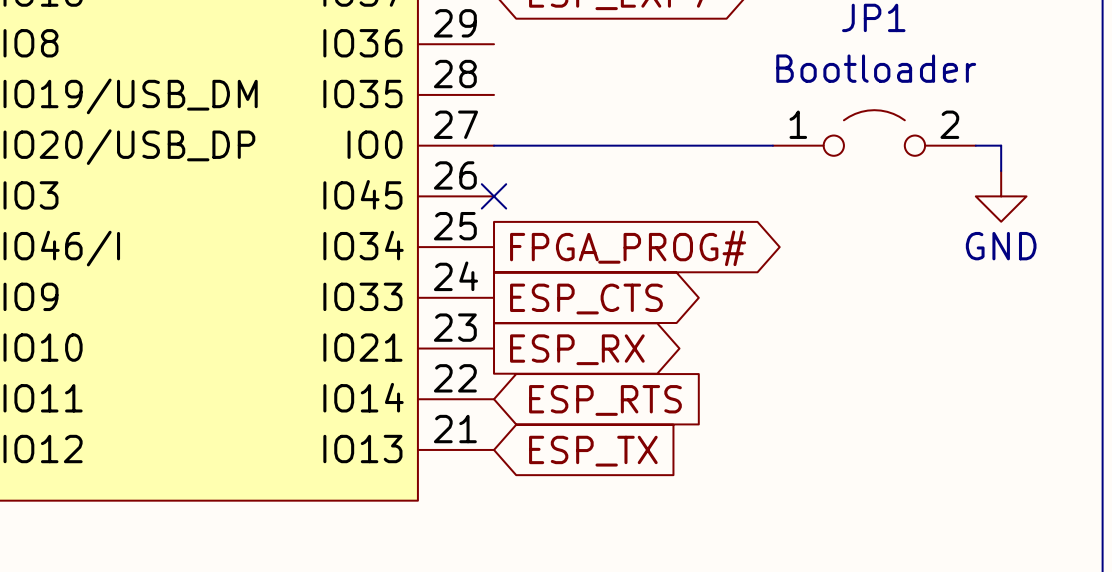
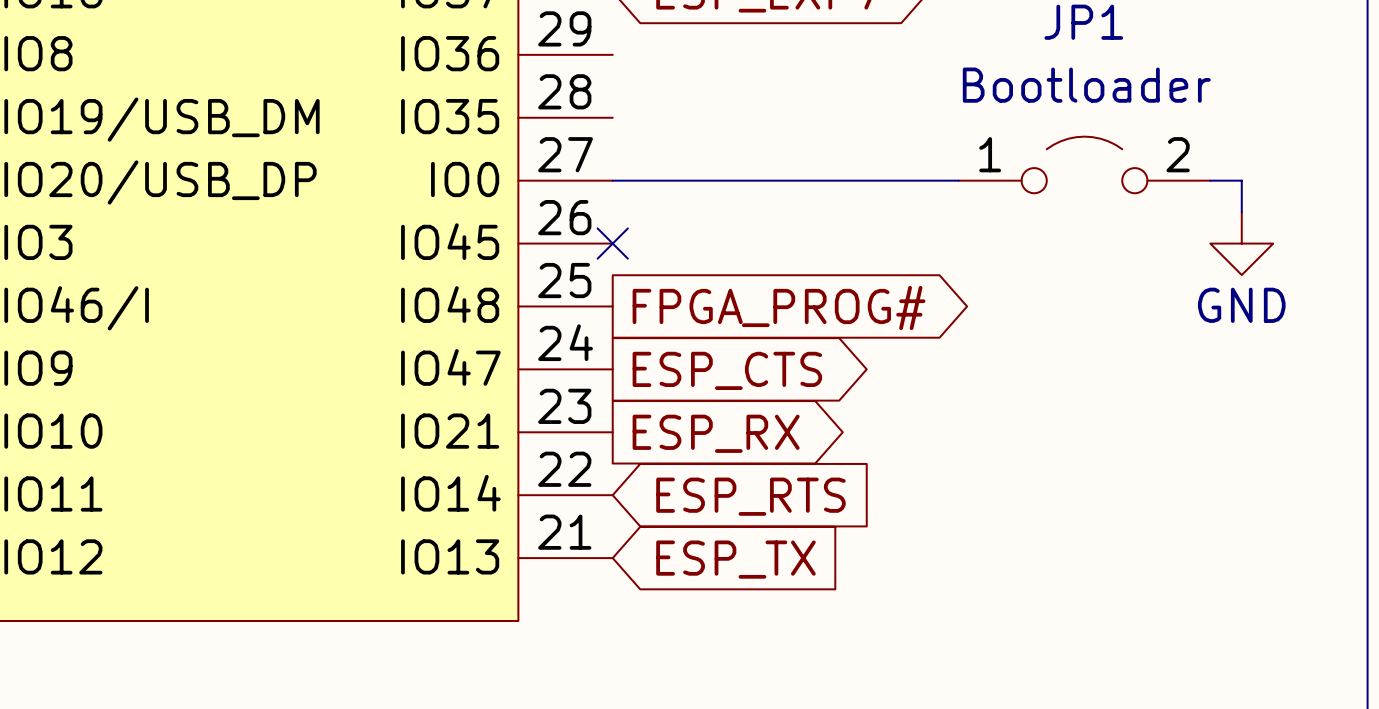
part pin name: IO34 (363, 245) -> IO48 (450, 304)
part pin name: IO33 (362, 296) -> IO47 (450, 367)

